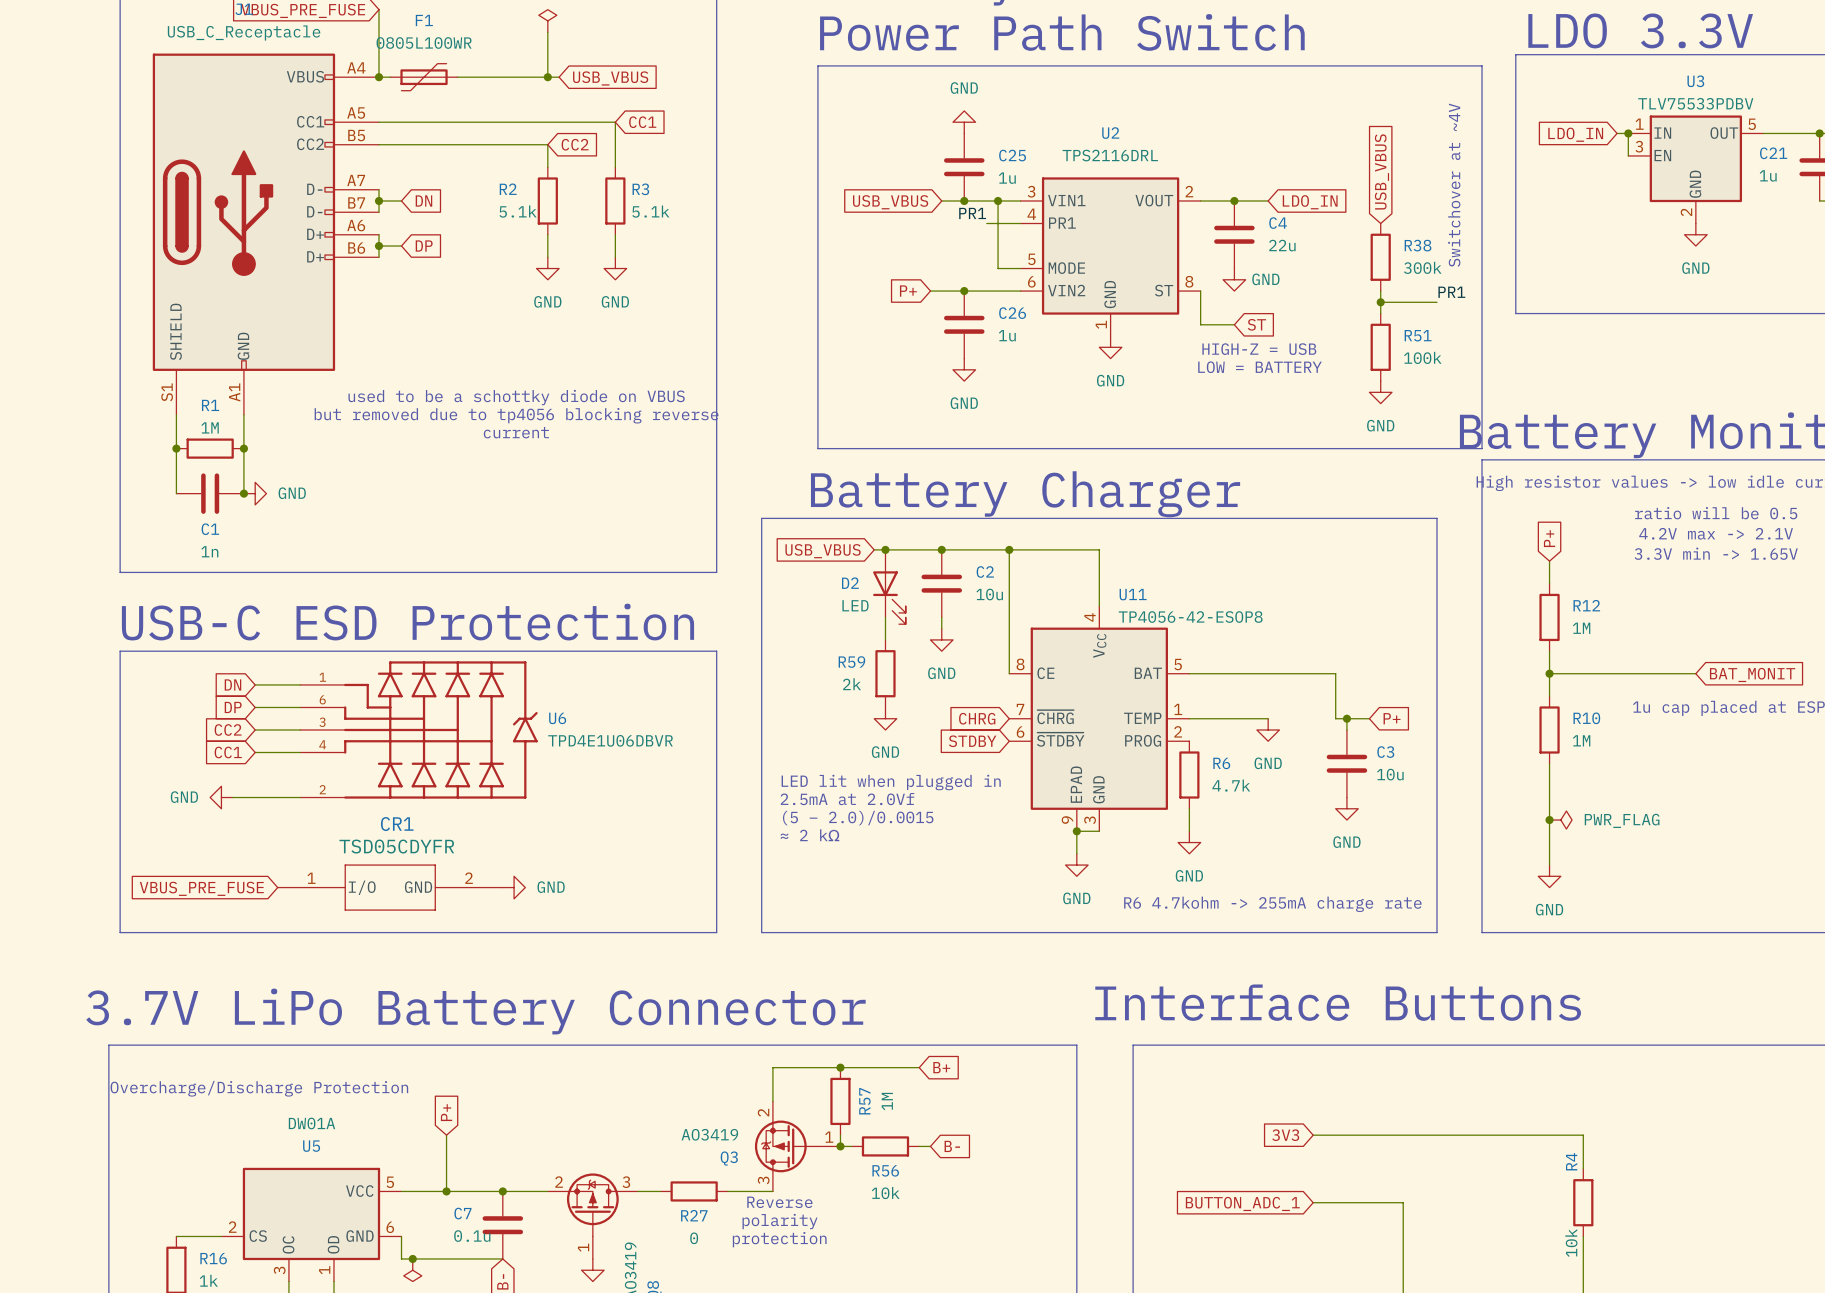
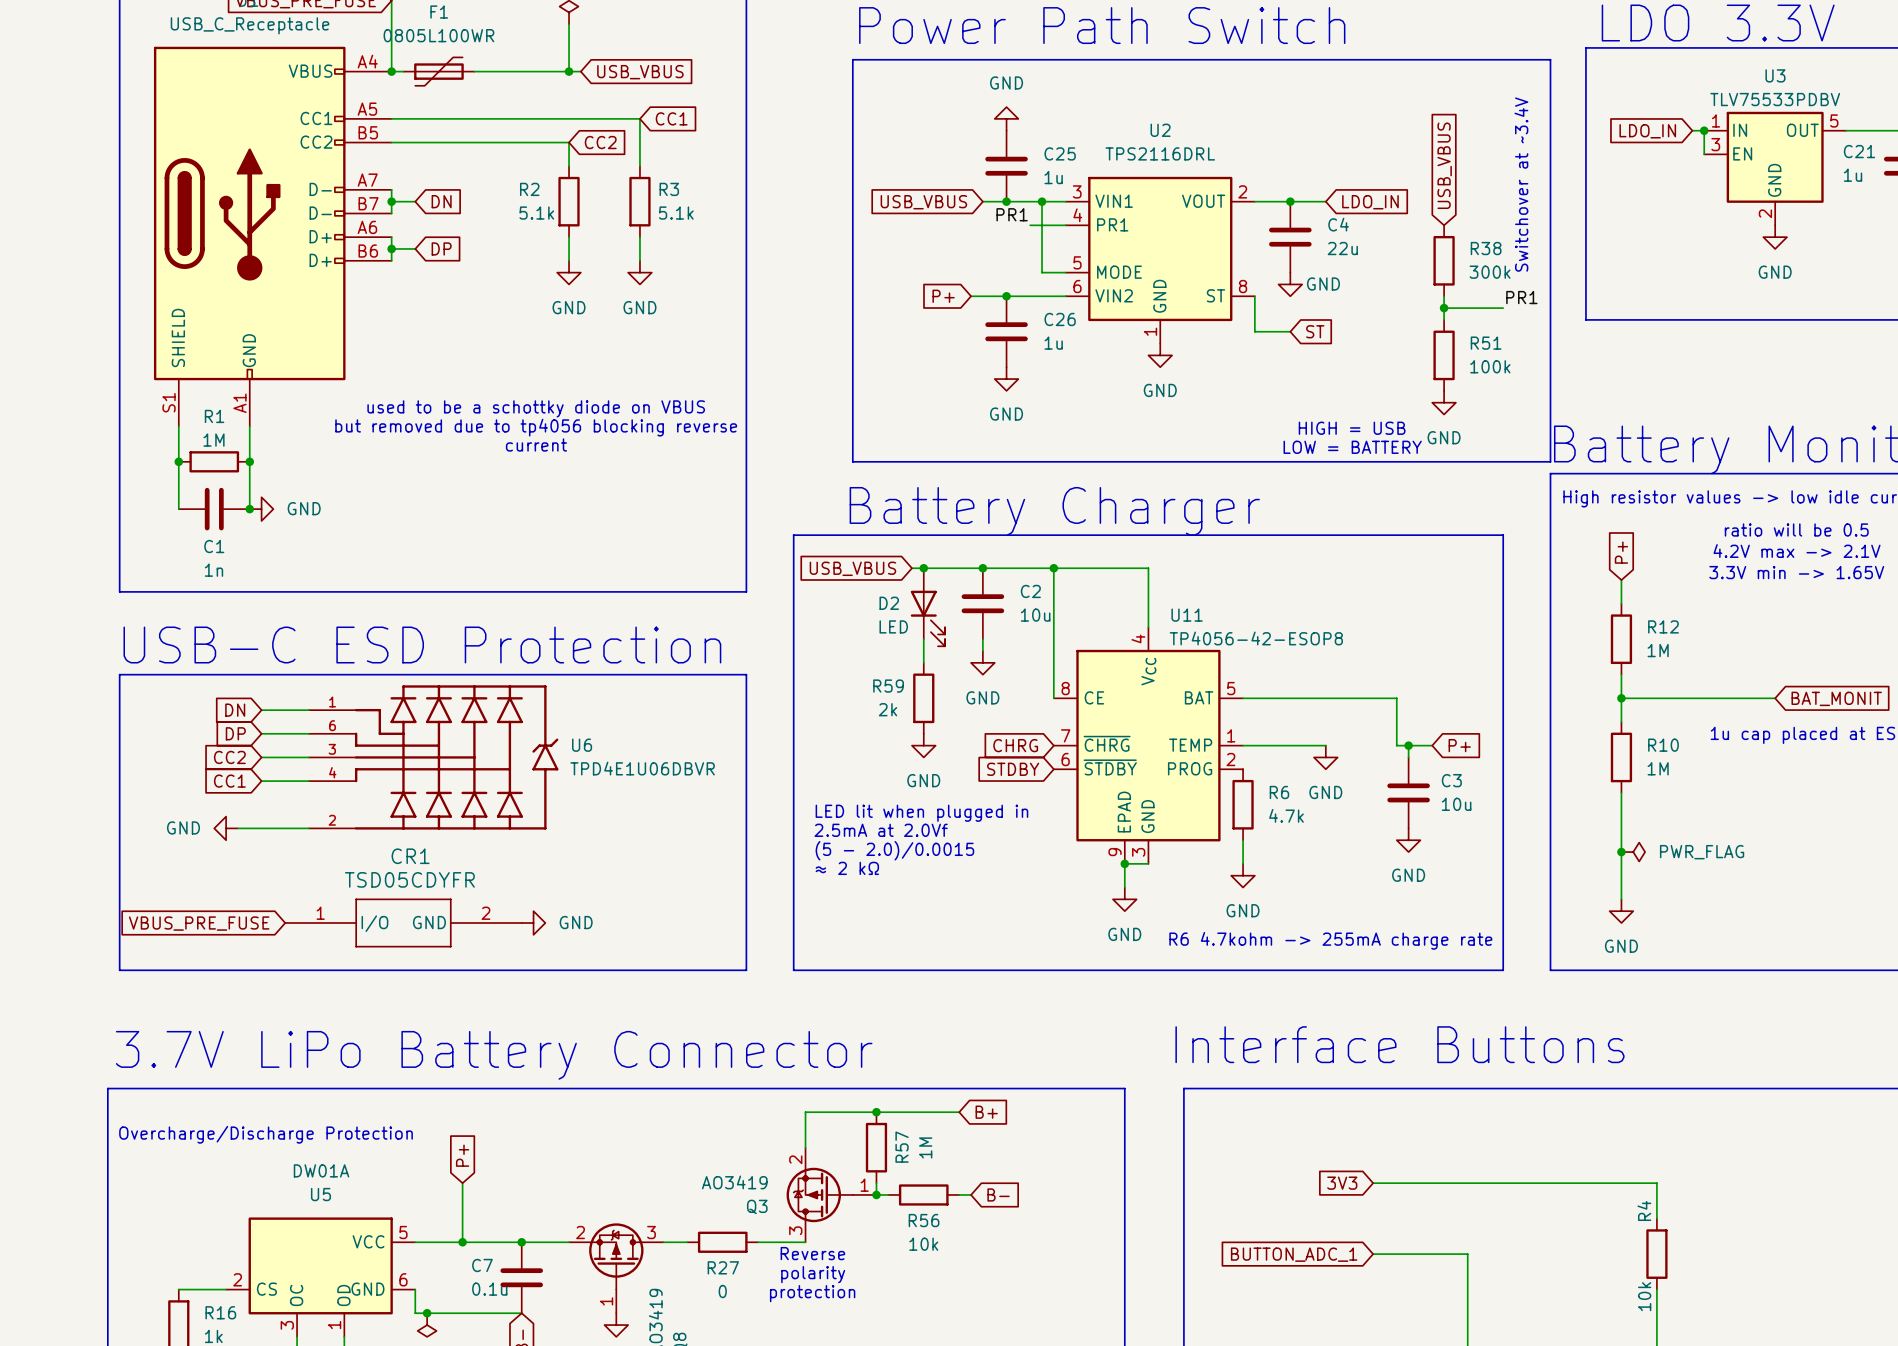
text: Switchover at ~4V (1454, 185) -> Switchover at ~3.4V (1521, 184)
text: HIGH-Z = USB (1259, 349) -> none
text position: LOW = BATTERY (1259, 367) -> LOW = BATTERY (1352, 447)
text: none -> HIGH = USB (1352, 428)

